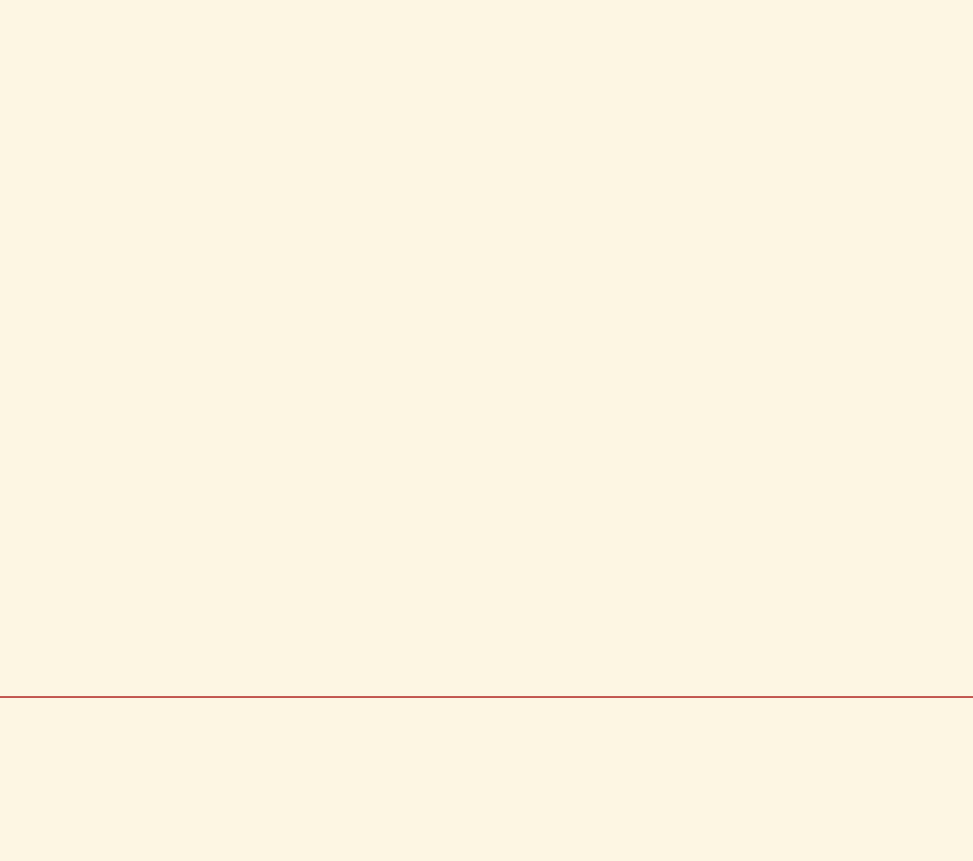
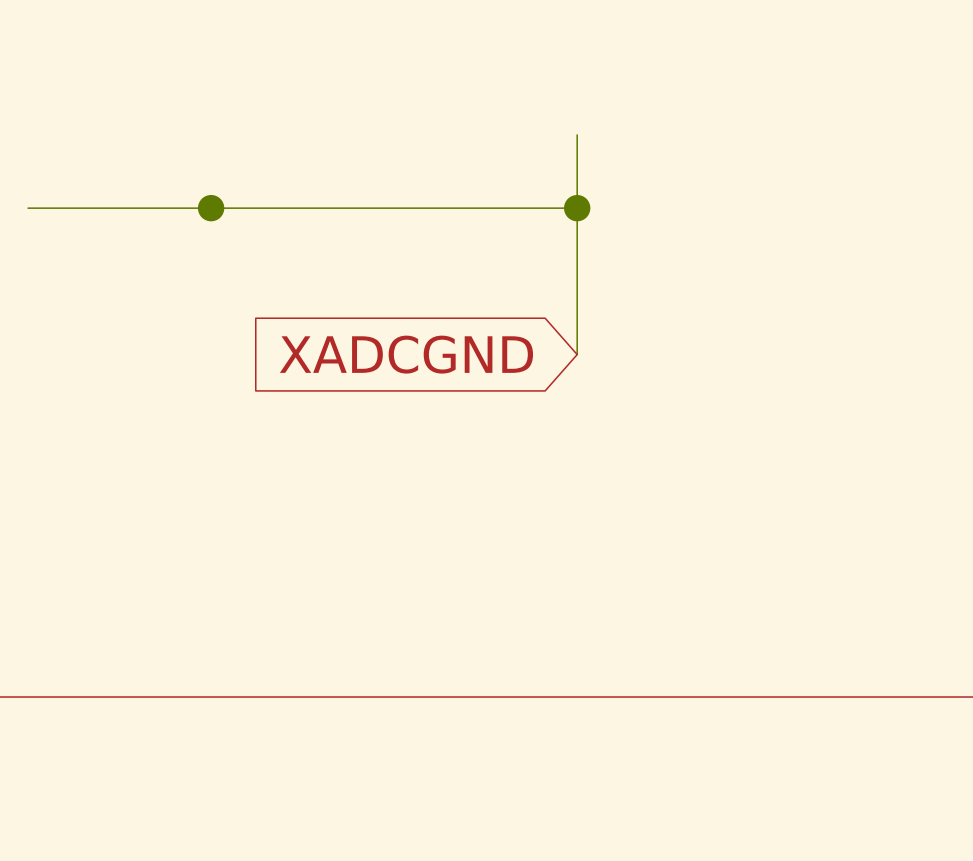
wire: none -> (577, 134) (577, 354)
wire: none -> (28, 208) (577, 208)
junction: none -> (211, 208)
junction: none -> (577, 208)
global label: none -> XADCGND (406, 354)

